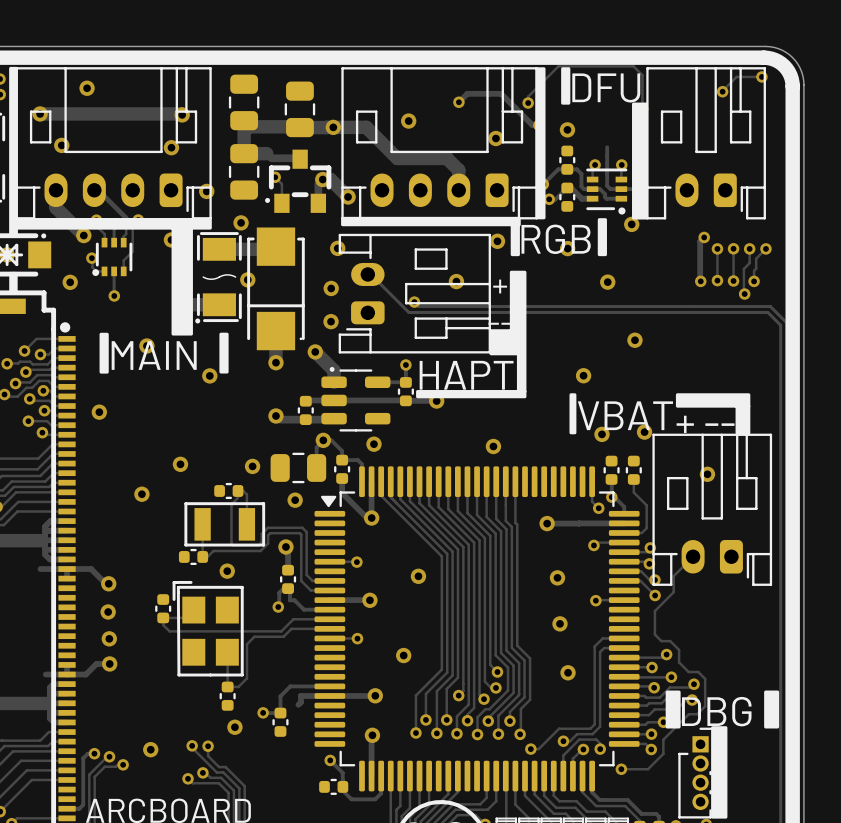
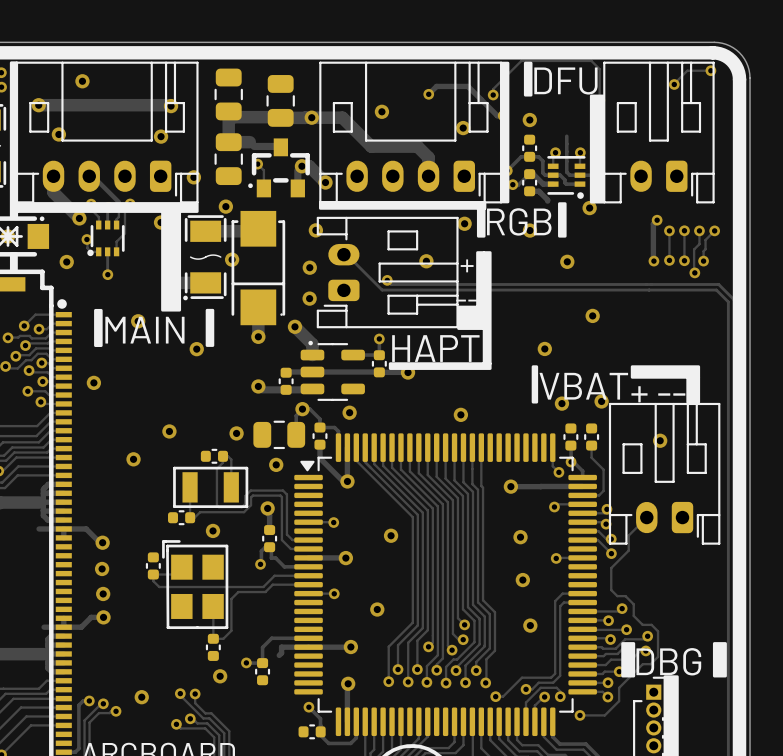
track: none -> (529, 191) (538, 191) (547, 201)

